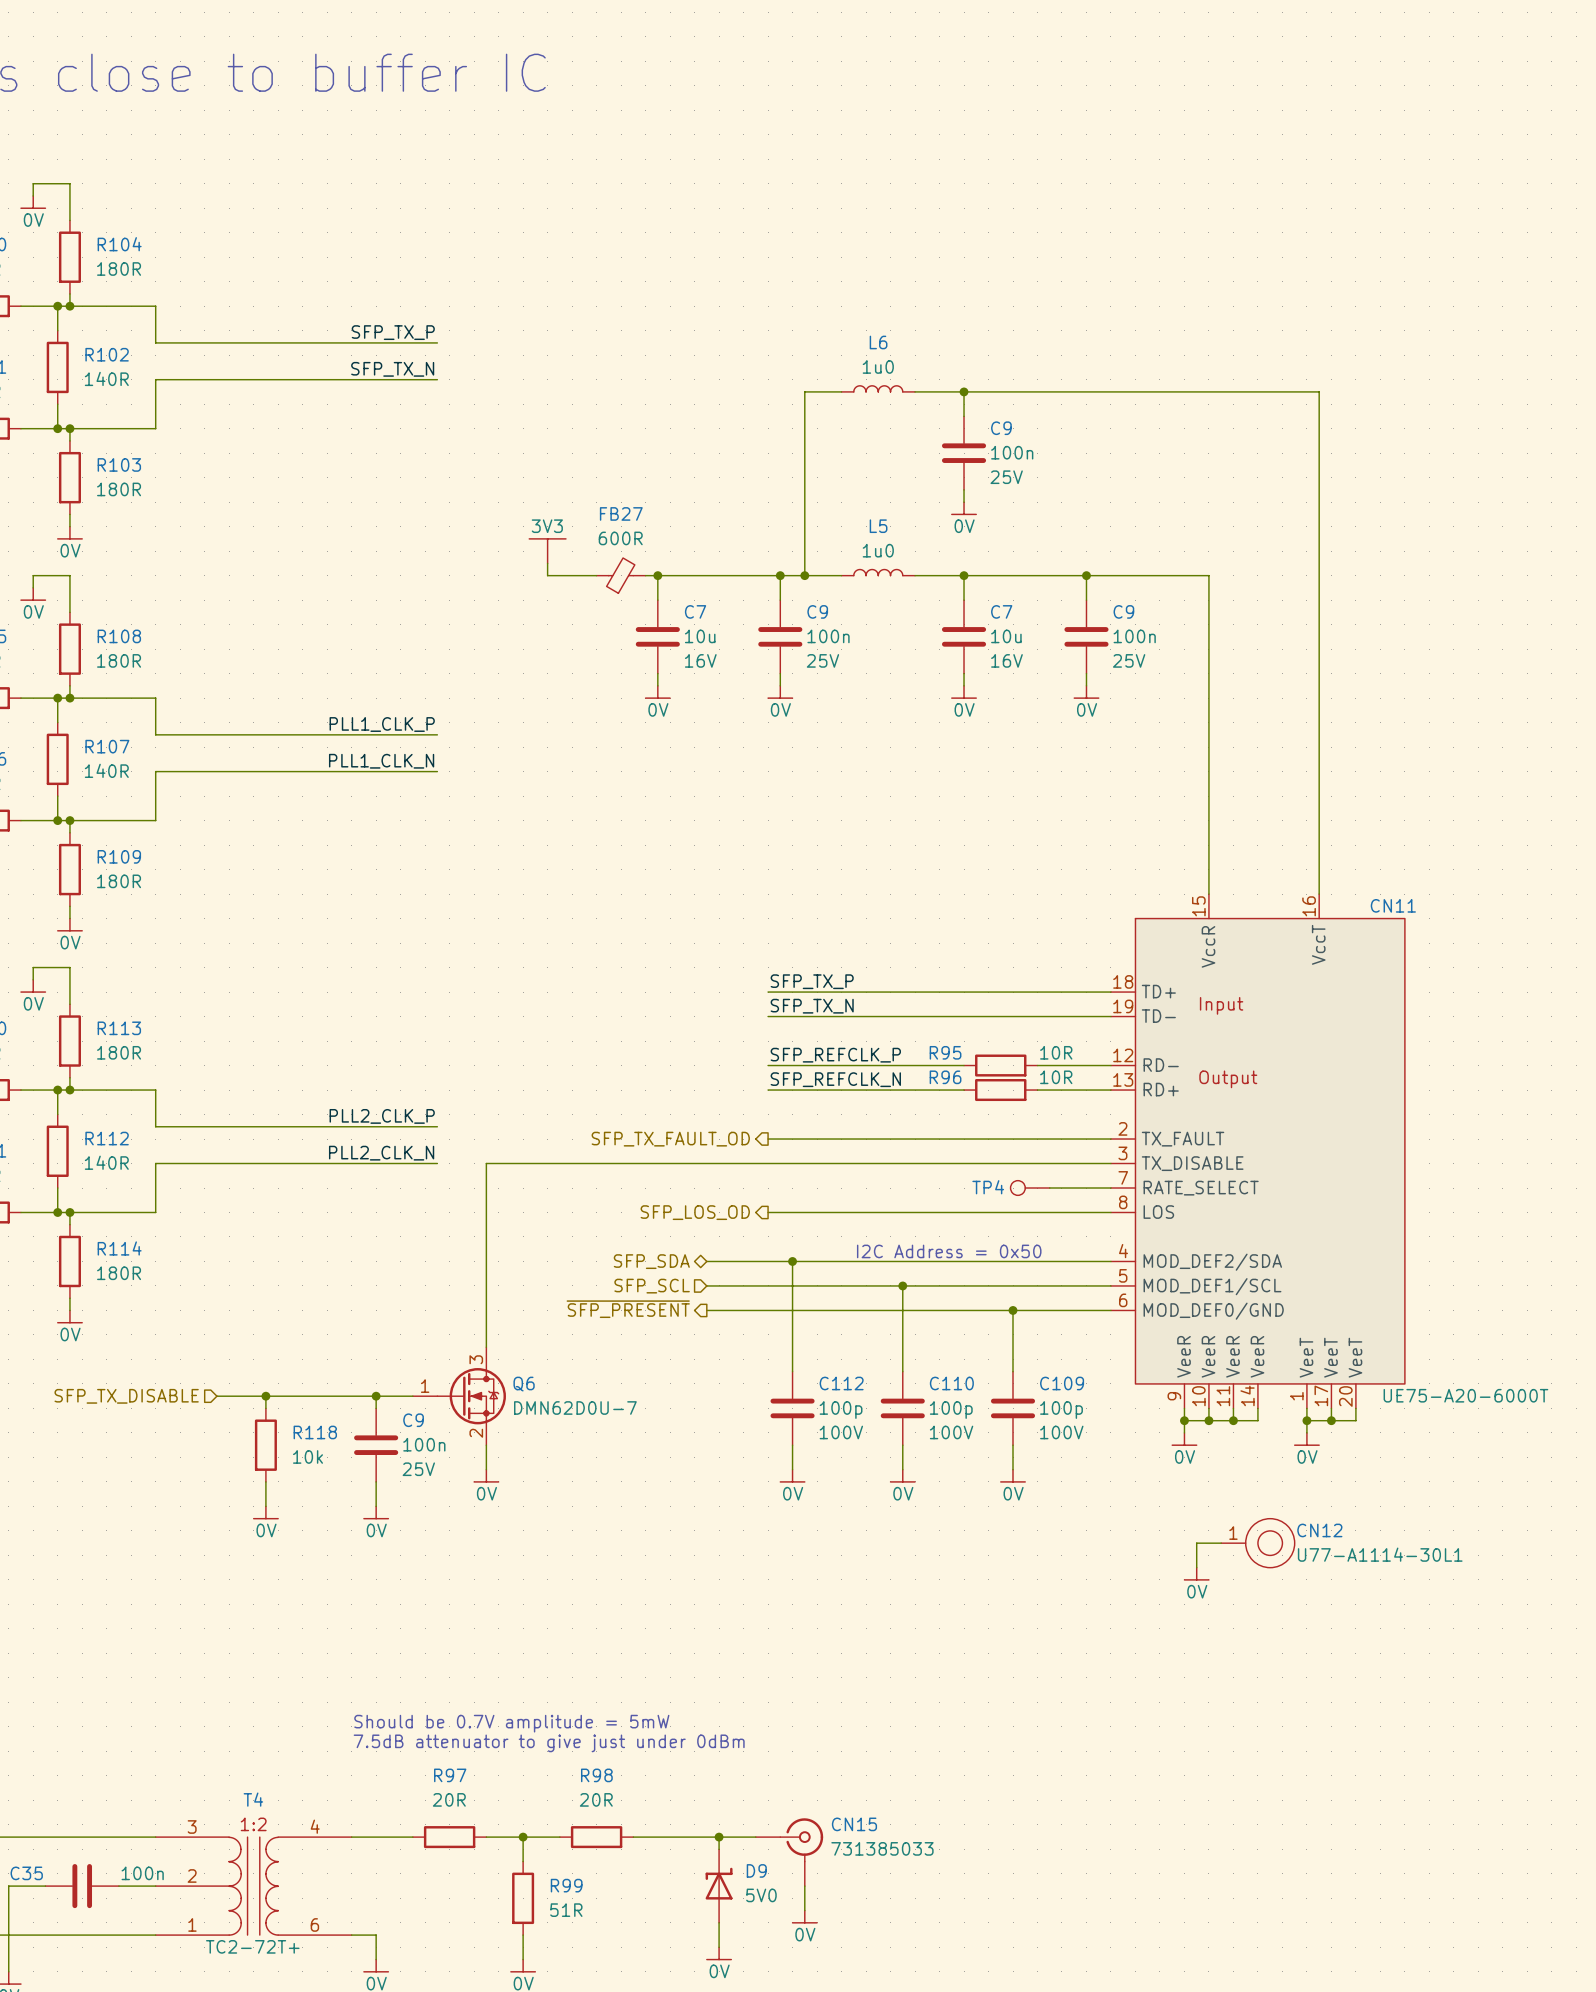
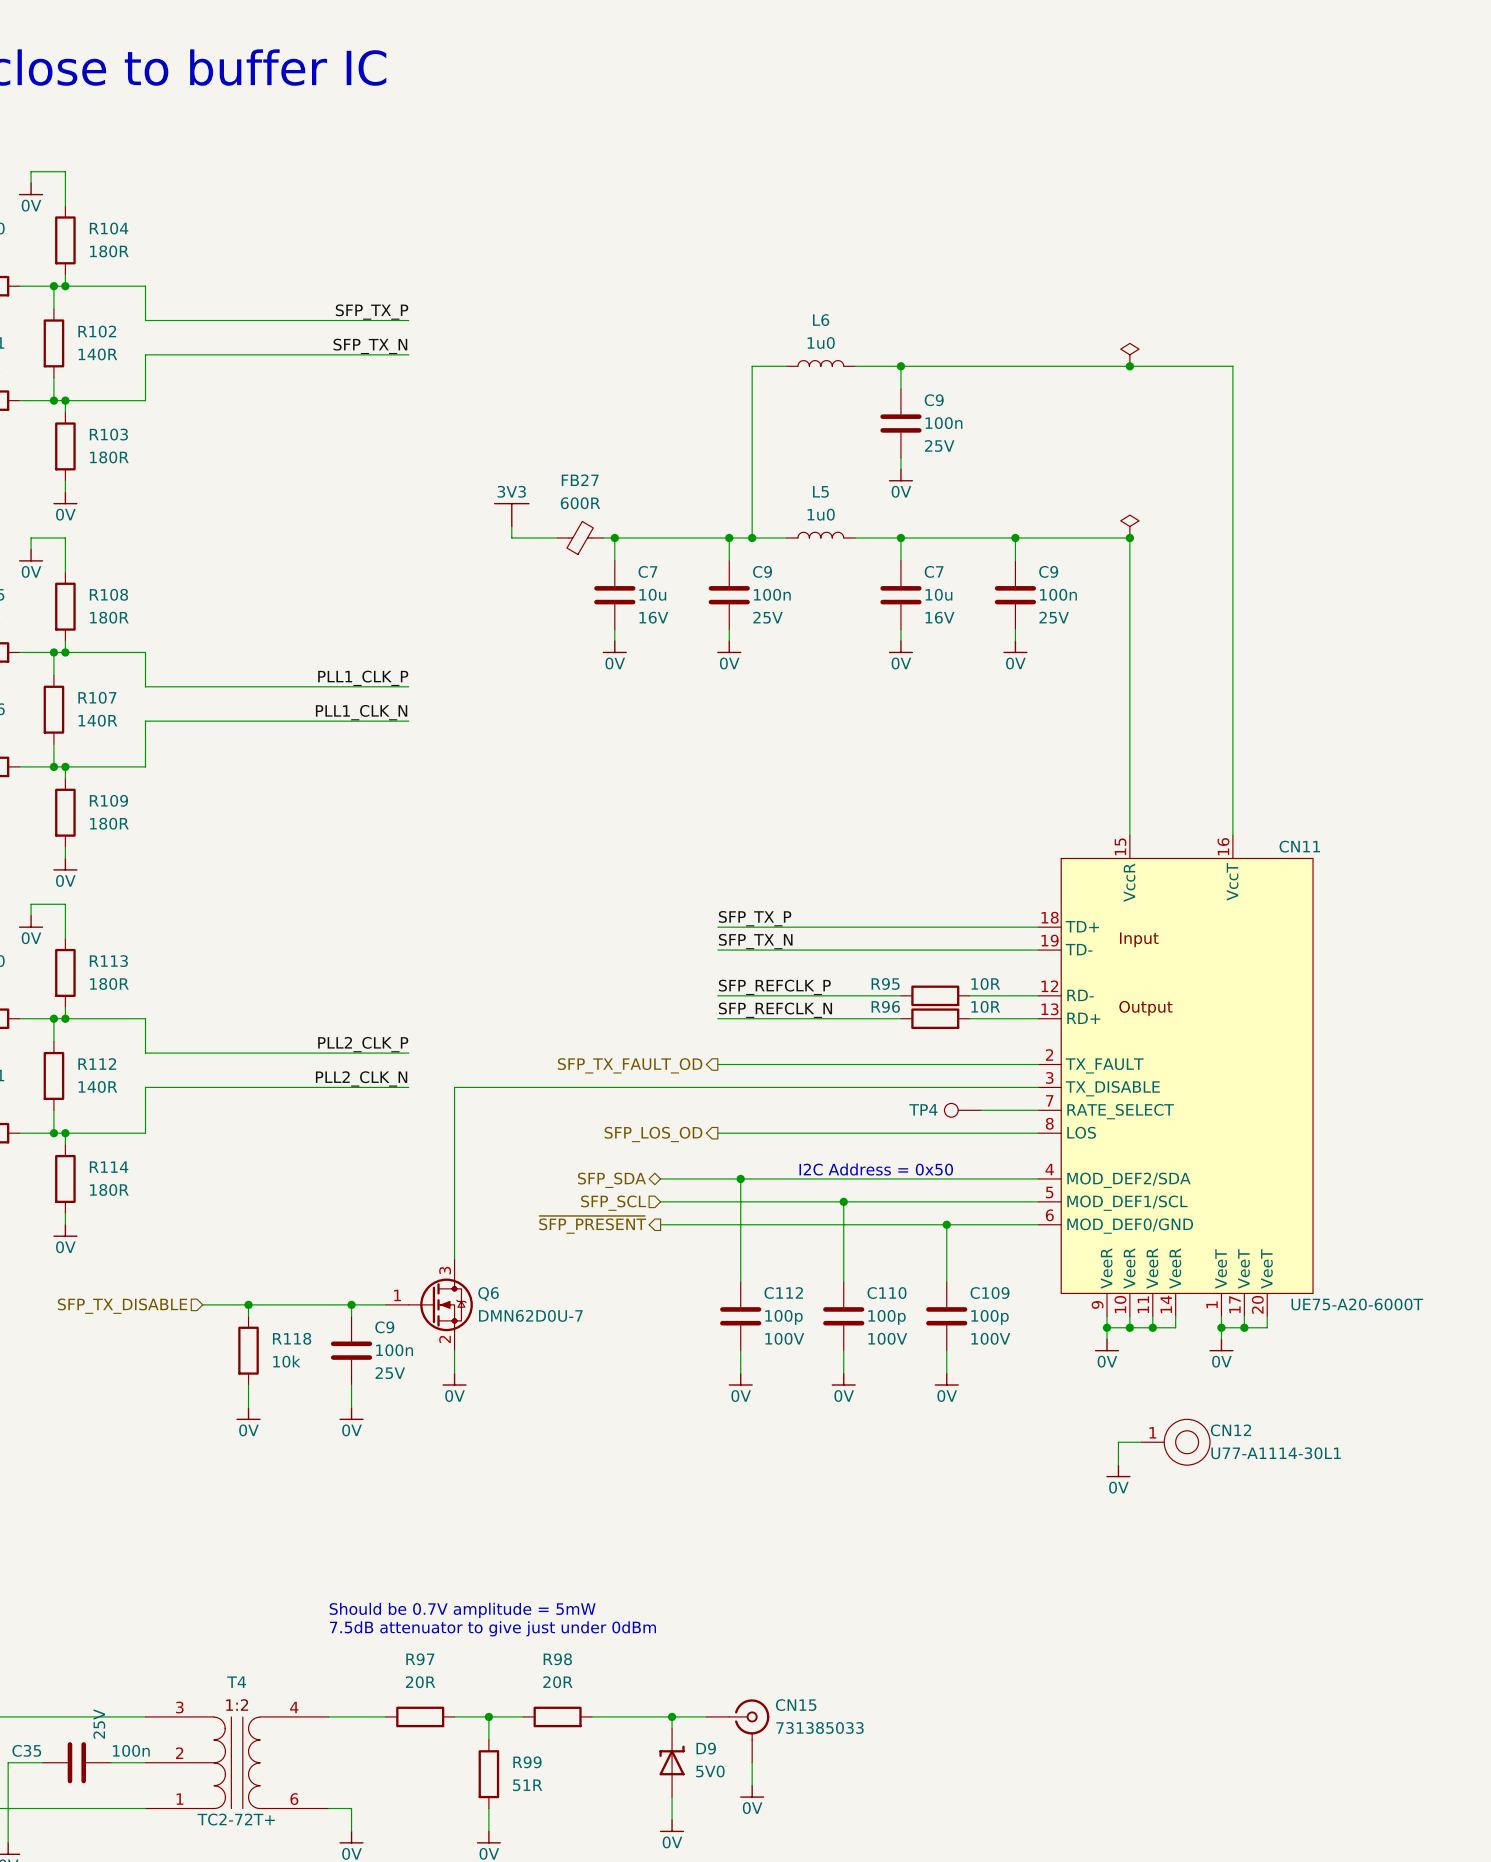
power symbol: none -> (1129, 354)
junction: none -> (1129, 366)
power symbol: none -> (1129, 526)
junction: none -> (1129, 537)
C35 text: none -> 25V (99, 1723)

